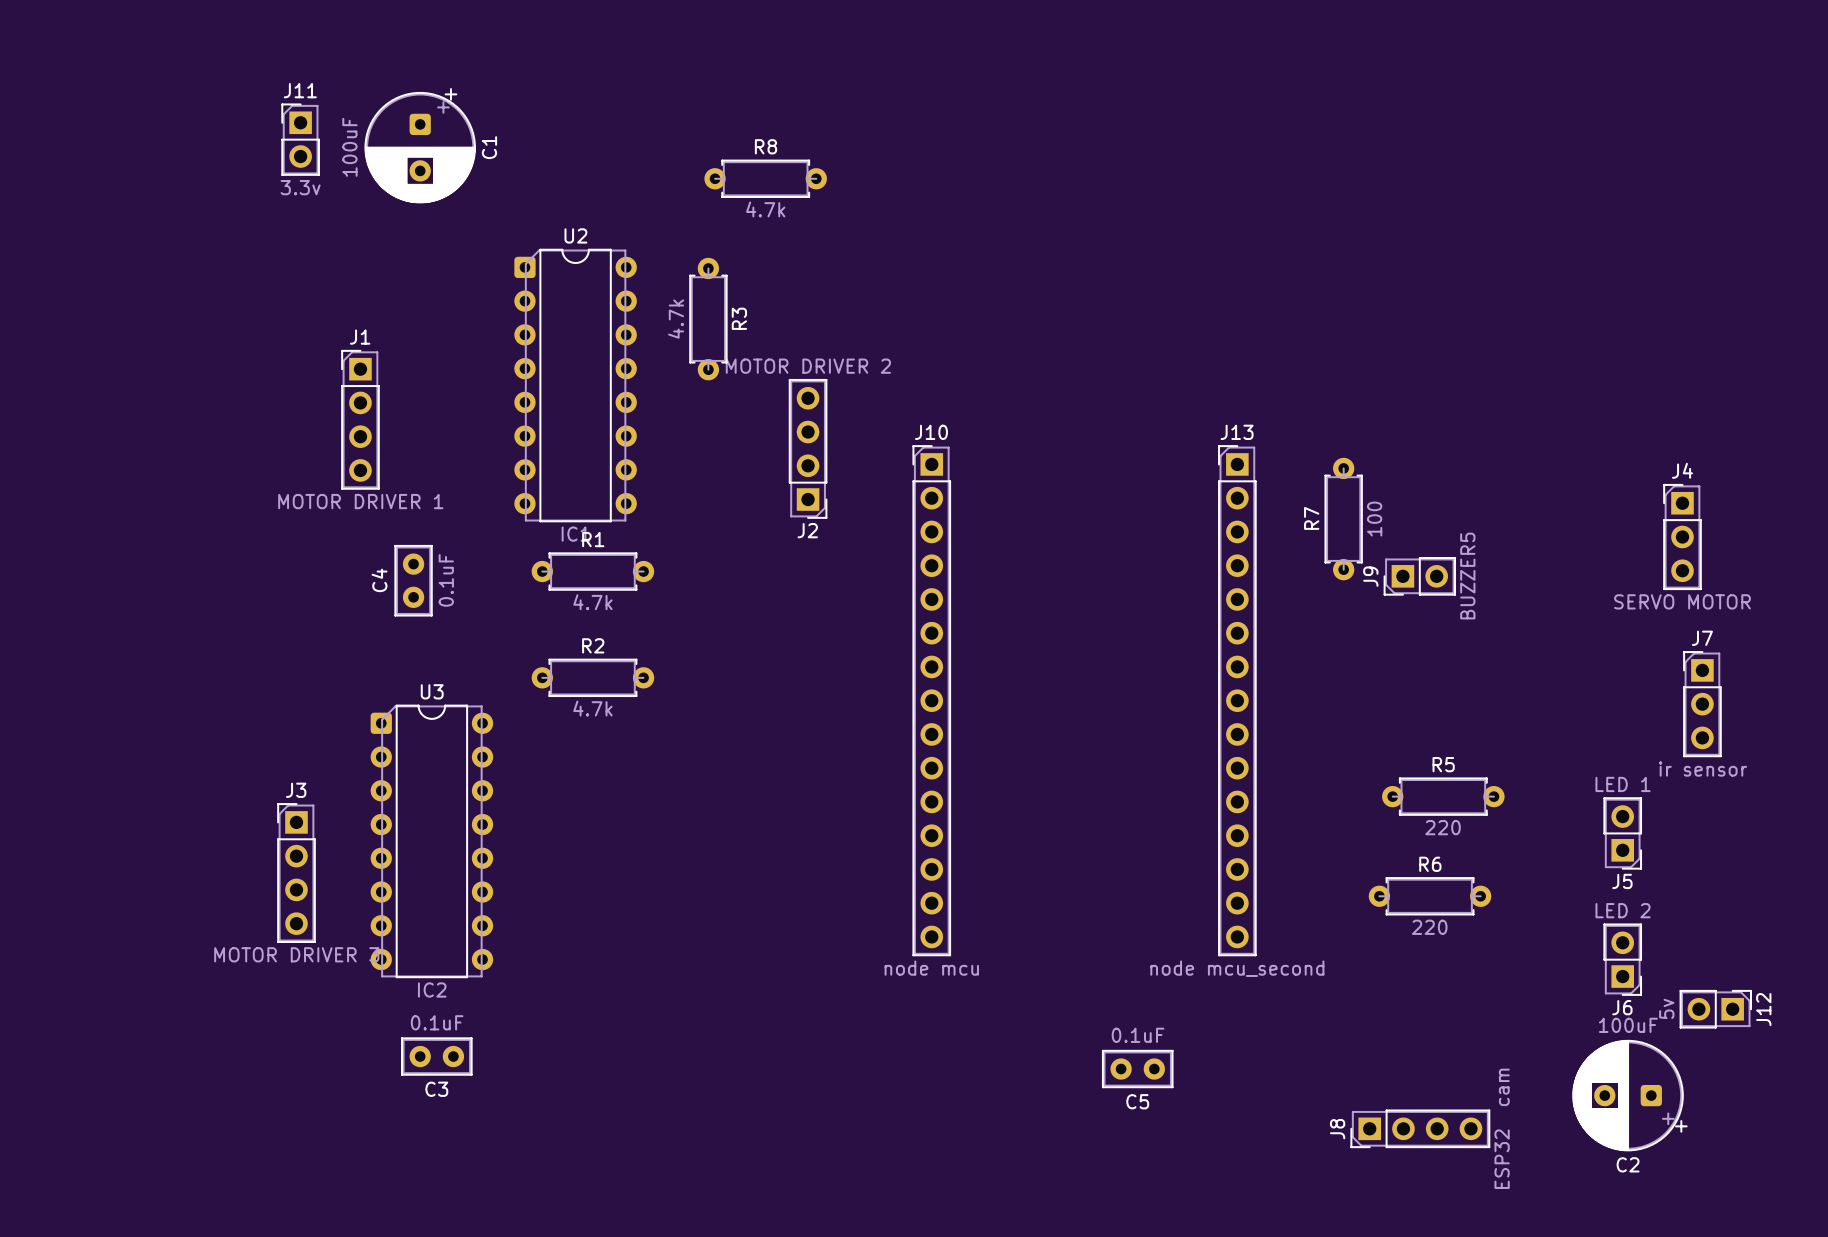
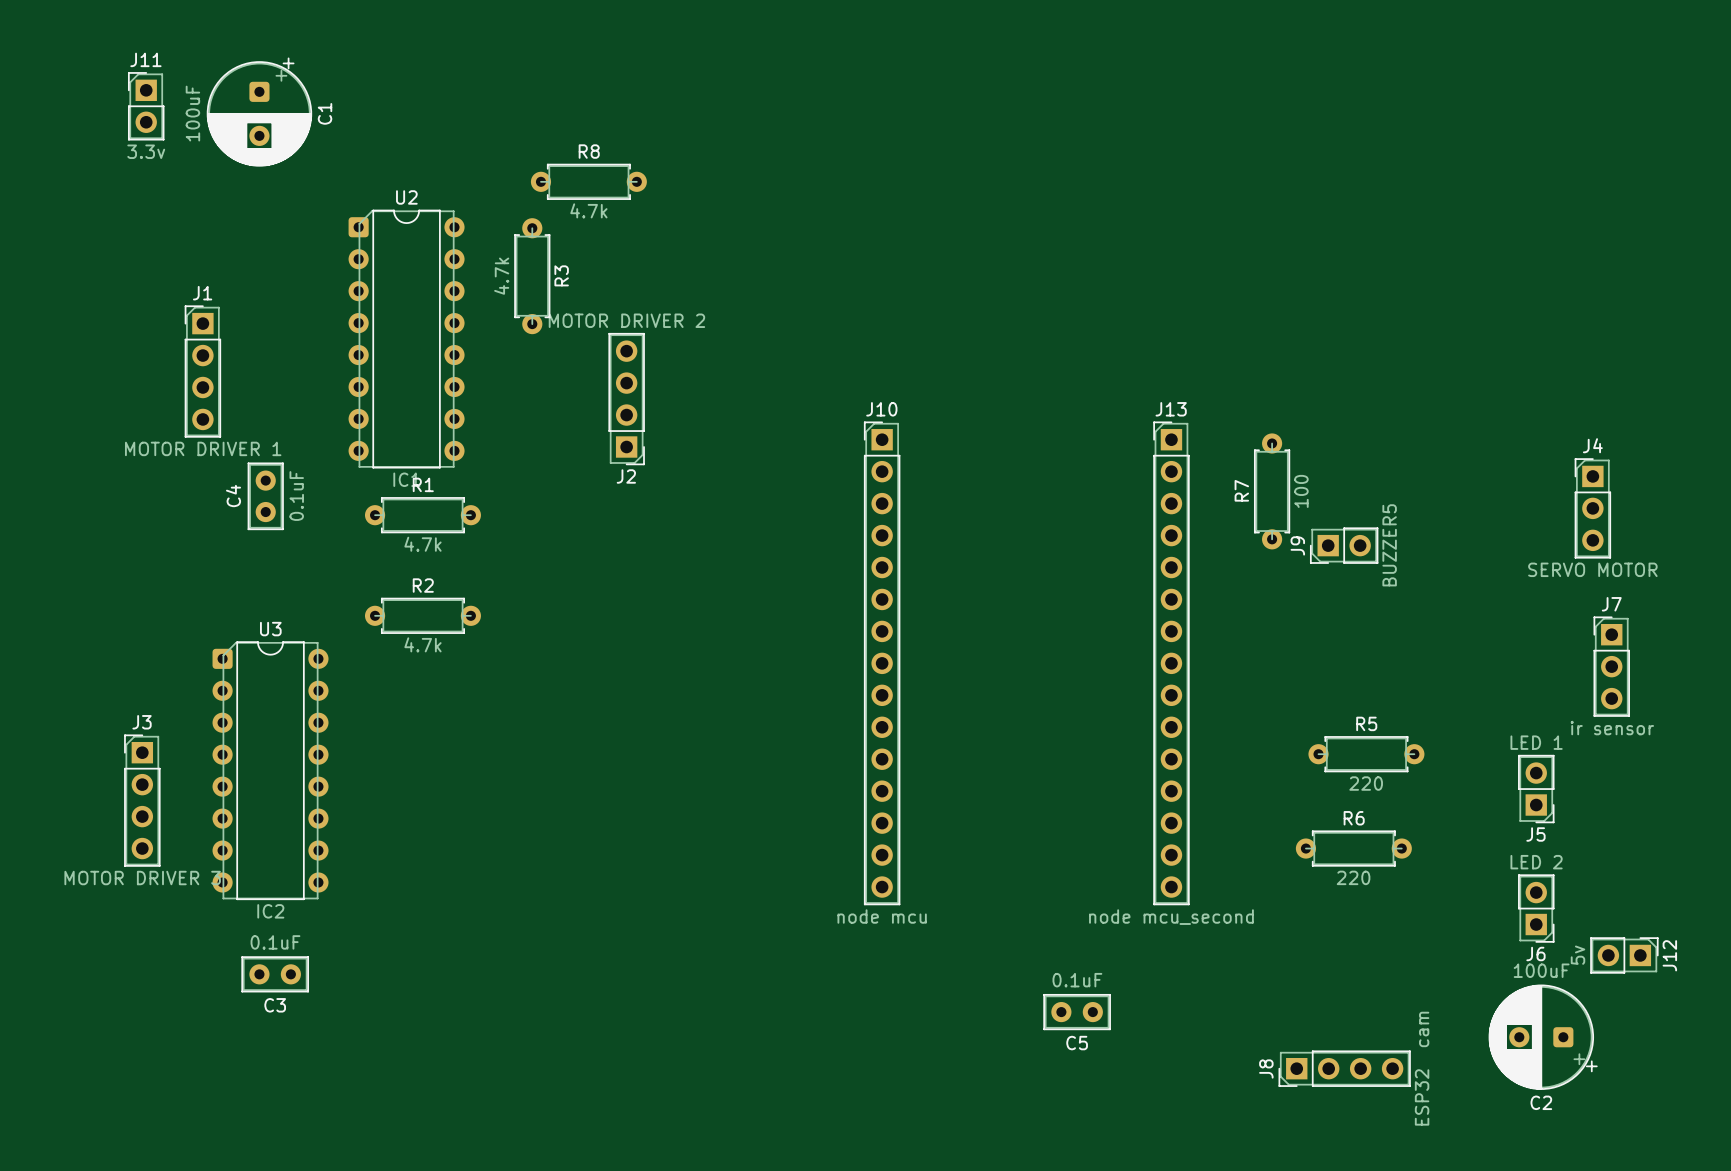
J11 position: (300, 139) -> (146, 106)
C1 position: (420, 145) -> (259, 112)
R8 position: (765, 178) -> (588, 181)
R3 position: (708, 319) -> (532, 276)
U2 position: (575, 385) -> (406, 339)
J1 position: (360, 419) -> (202, 371)
J2 position: (808, 448) -> (626, 399)
R1 position: (592, 571) -> (422, 515)
C4 position: (413, 580) -> (265, 496)
R2 position: (592, 677) -> (422, 615)
U3 position: (431, 841) -> (270, 770)
J3 position: (296, 873) -> (142, 800)
C3 position: (436, 1056) -> (275, 974)

